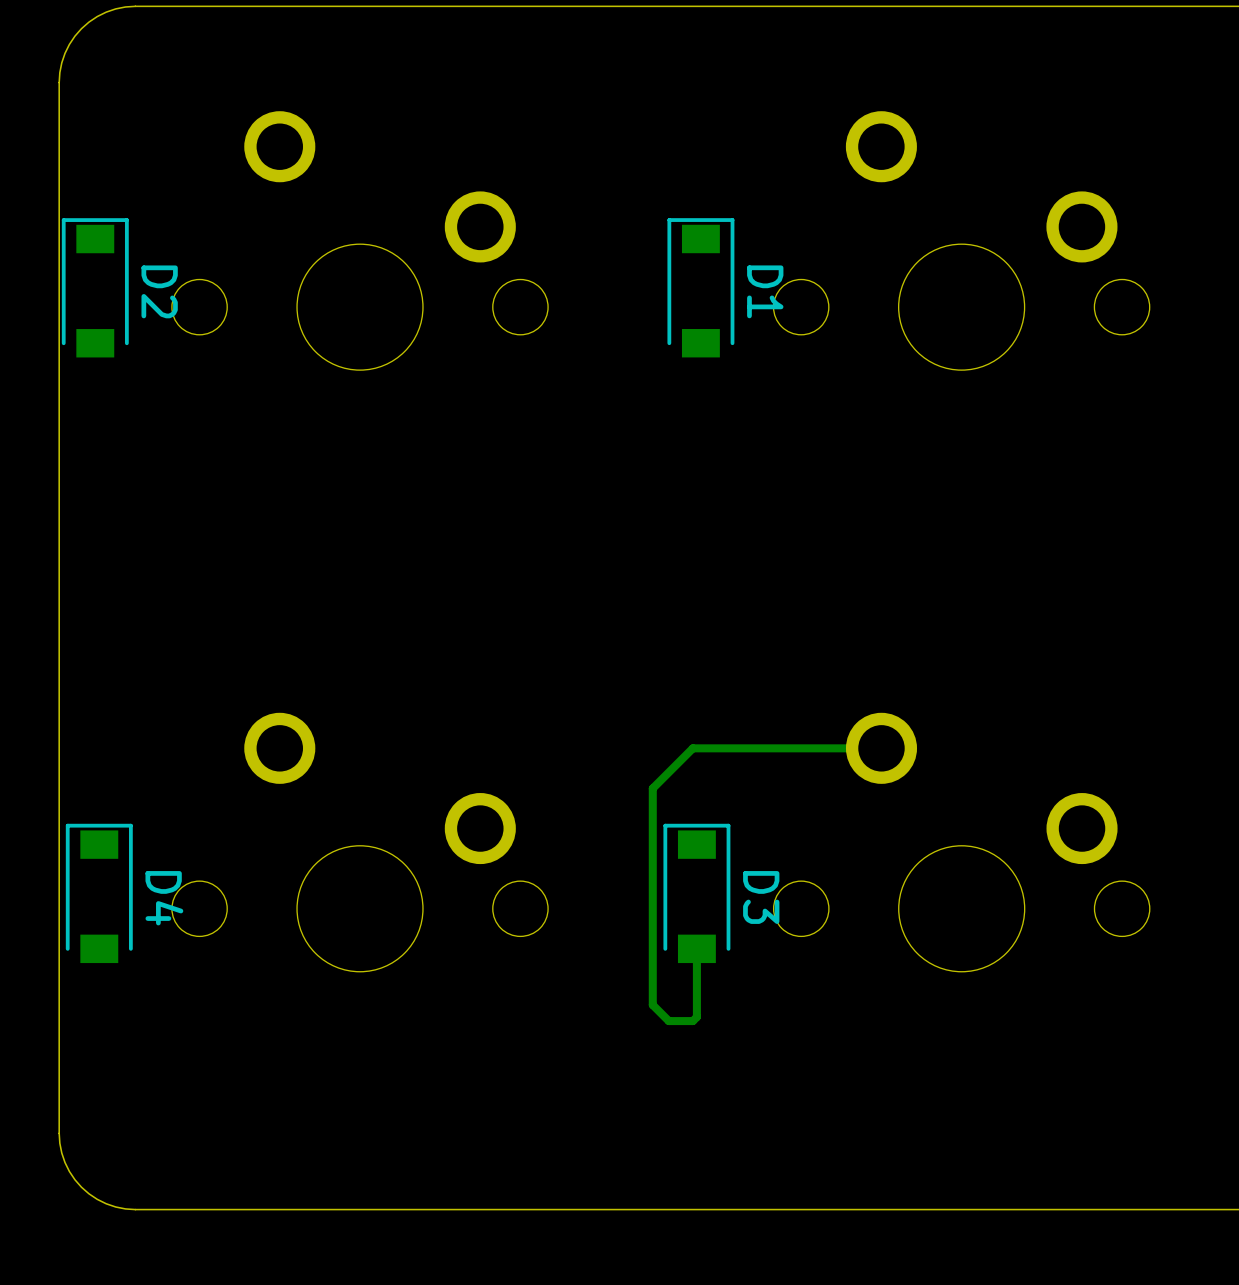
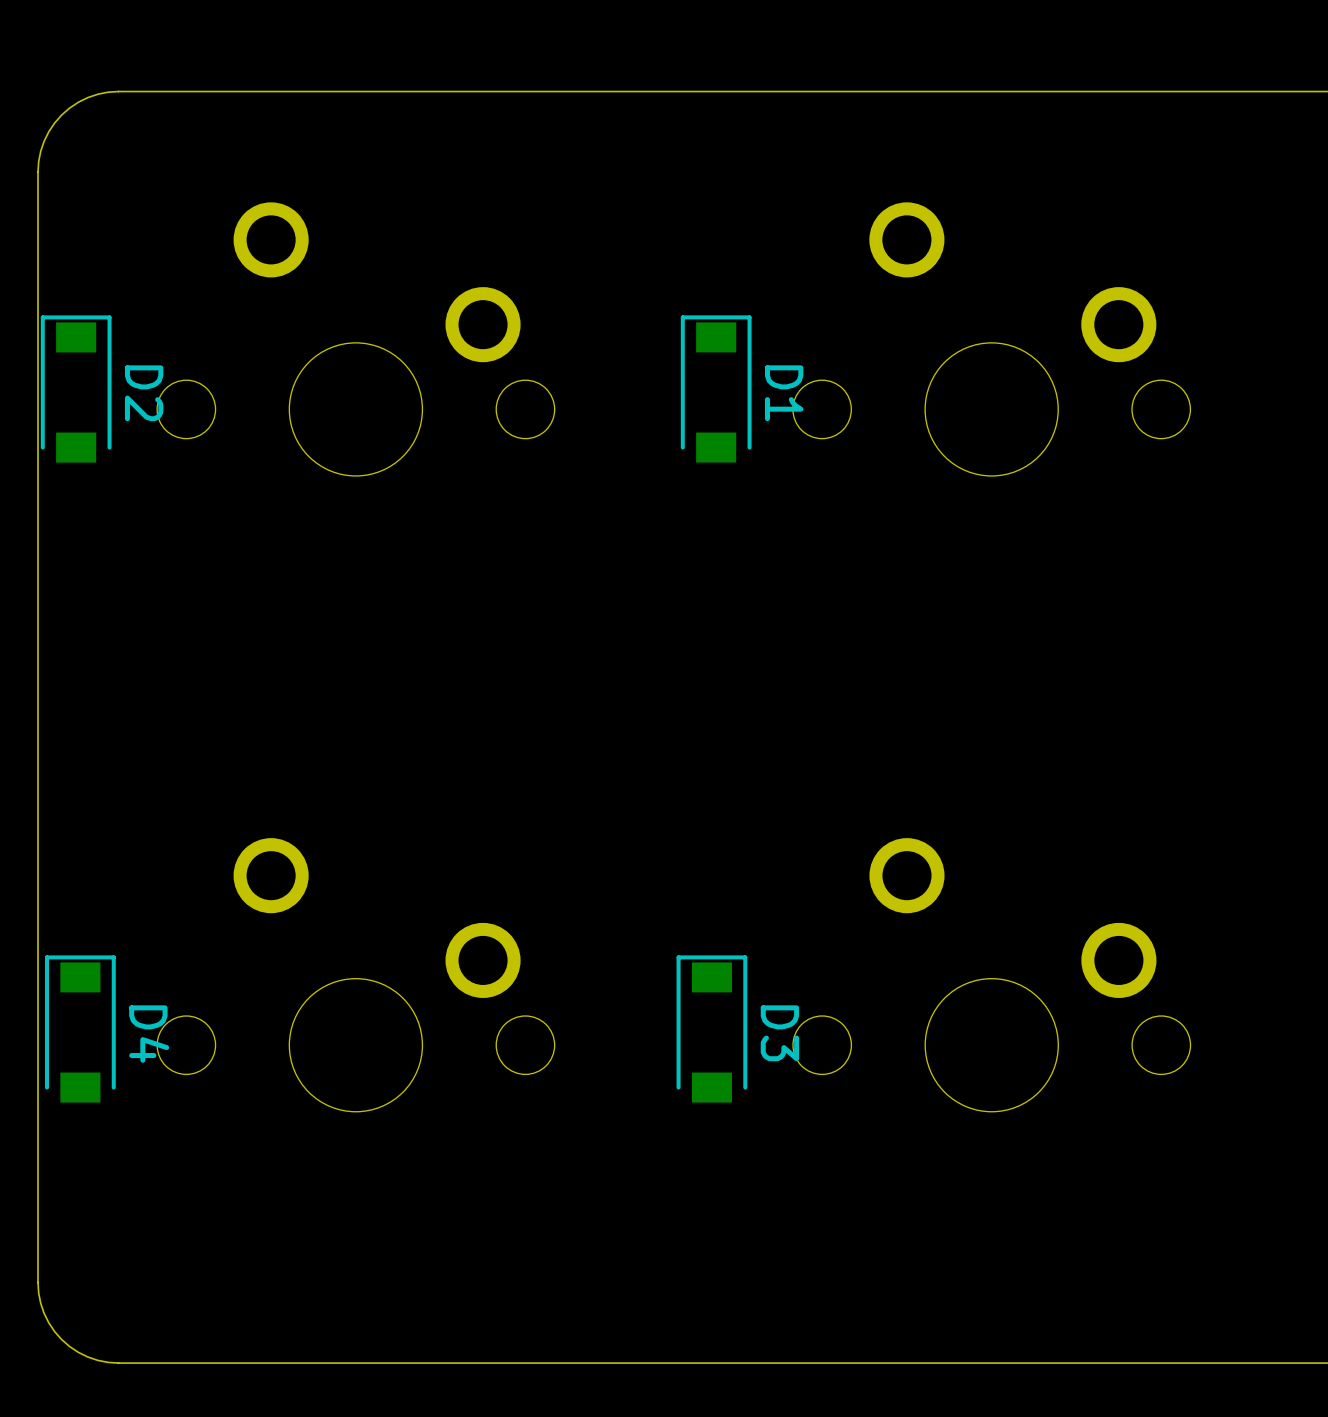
track: (881, 748) (692, 748) (652, 788) (652, 1005) (668, 1021) (692, 1021) (696, 1017) (696, 948) -> none

